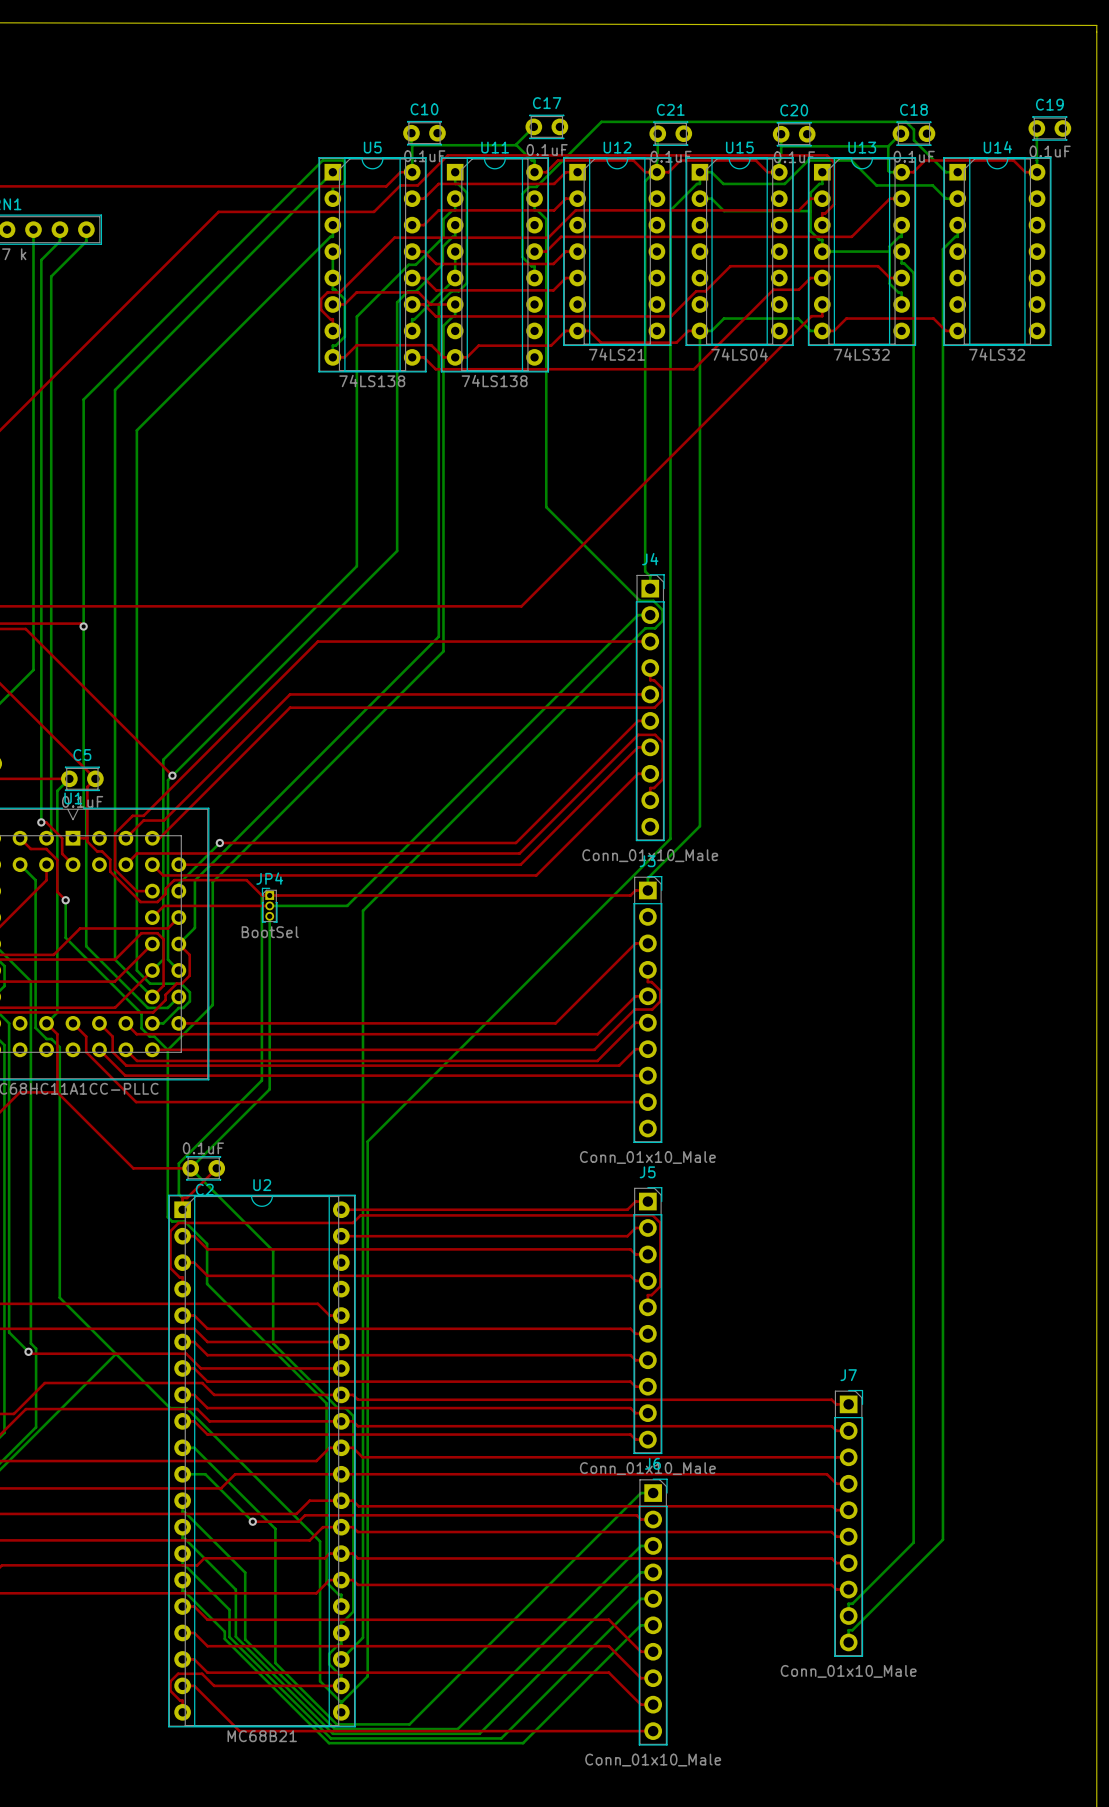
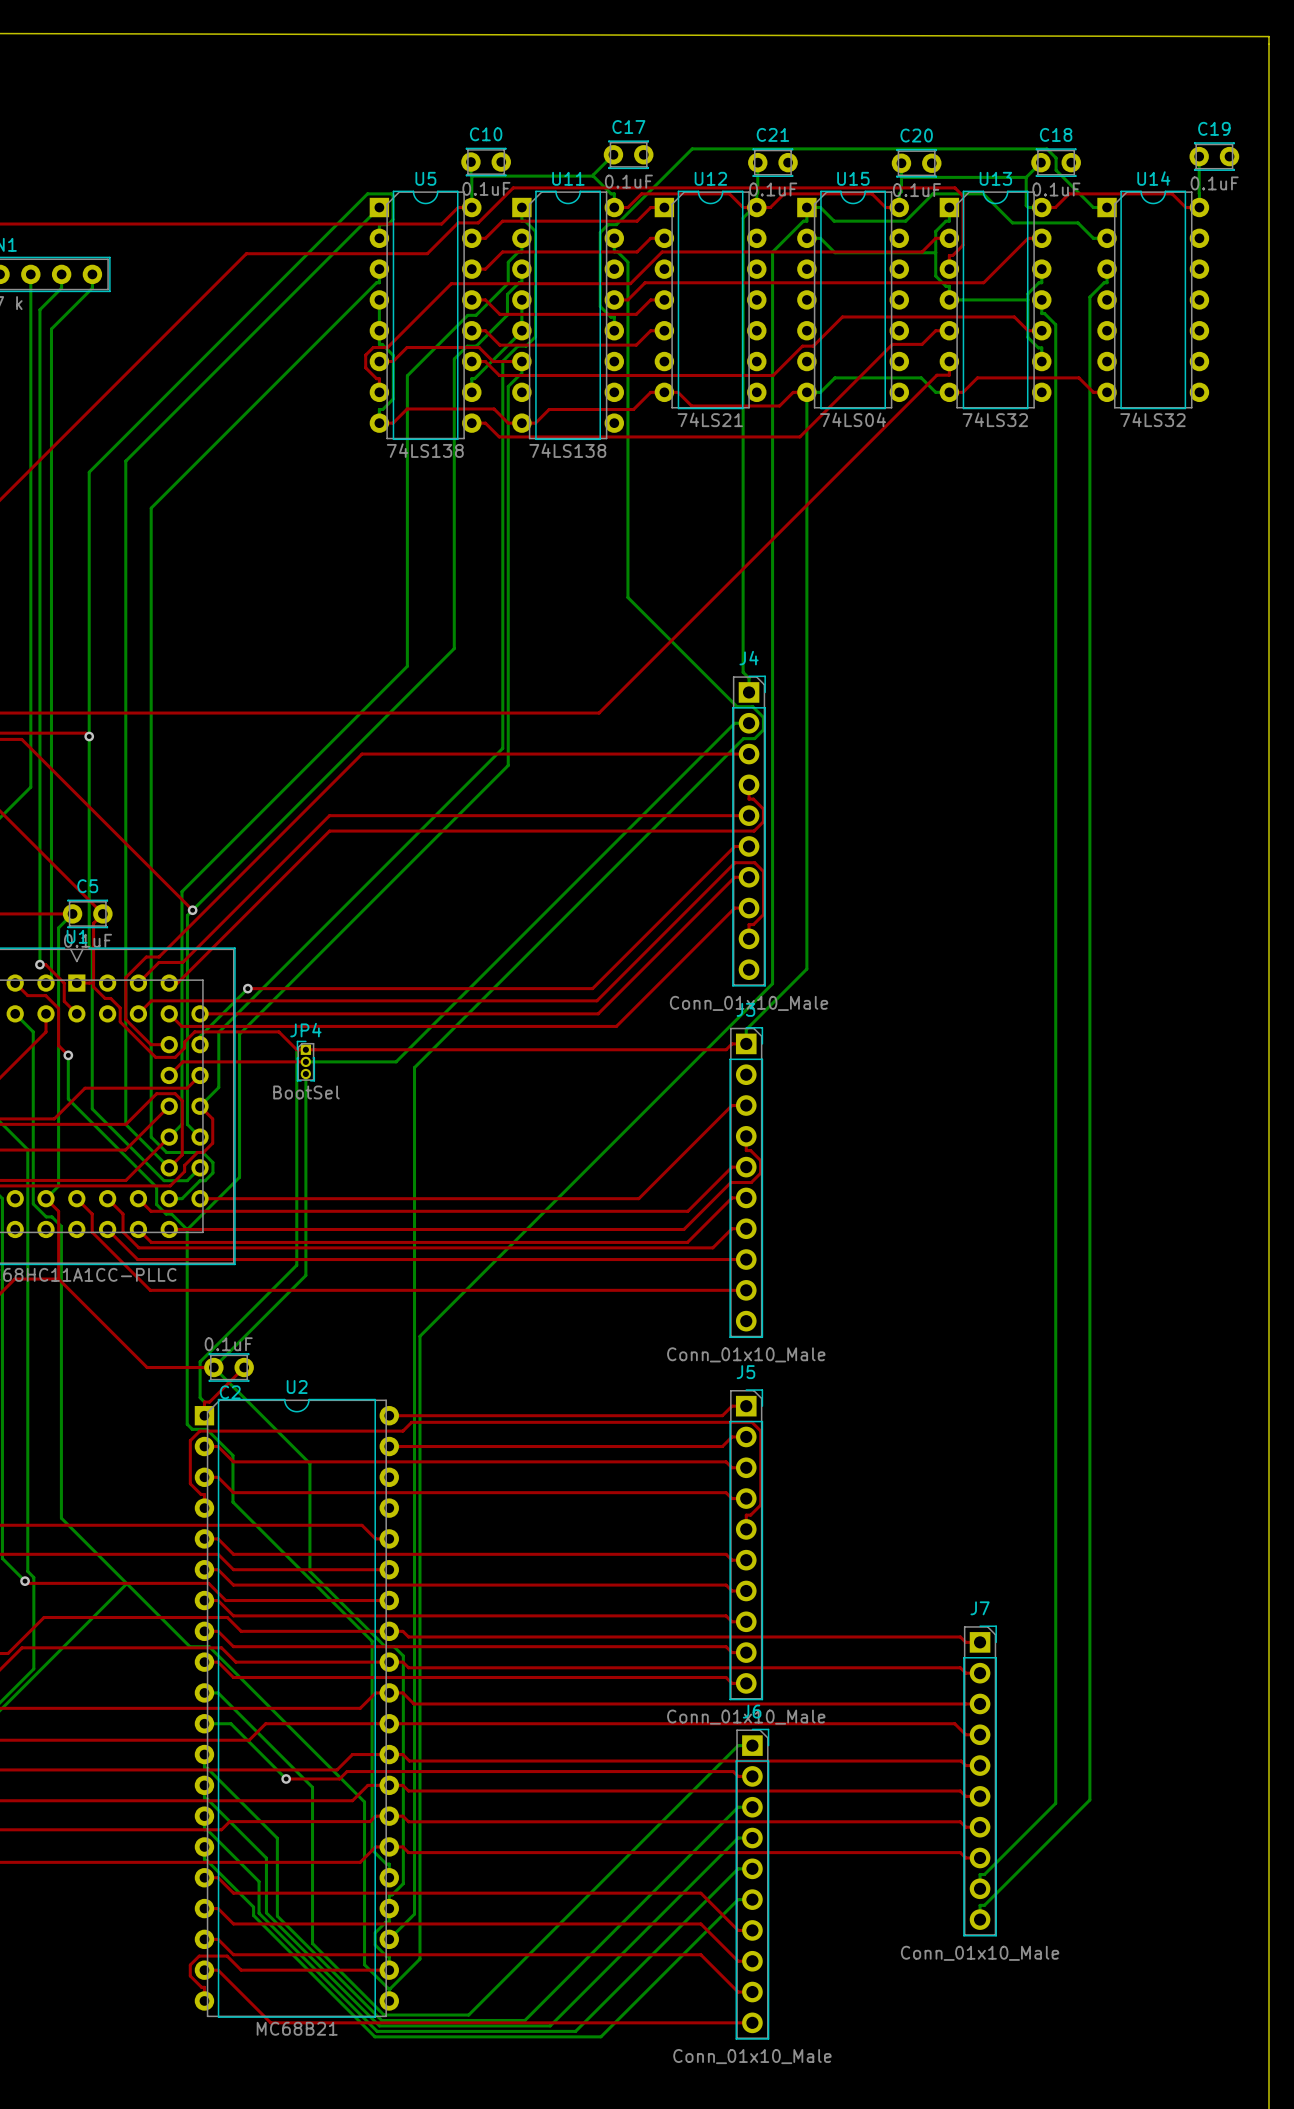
U5 footprint: [318, 157, 427, 373] -> [369, 190, 482, 441]
U11 footprint: [440, 157, 550, 373] -> [512, 190, 625, 441]
U12 footprint: [563, 157, 672, 347] -> [654, 190, 767, 410]
U15 footprint: [685, 157, 794, 347] -> [797, 190, 909, 410]
U13 footprint: [807, 157, 917, 347] -> [939, 190, 1052, 410]
U14 footprint: [943, 157, 1052, 347] -> [1097, 190, 1210, 410]
U2 footprint: [168, 1194, 356, 1728] -> [194, 1398, 399, 2018]

